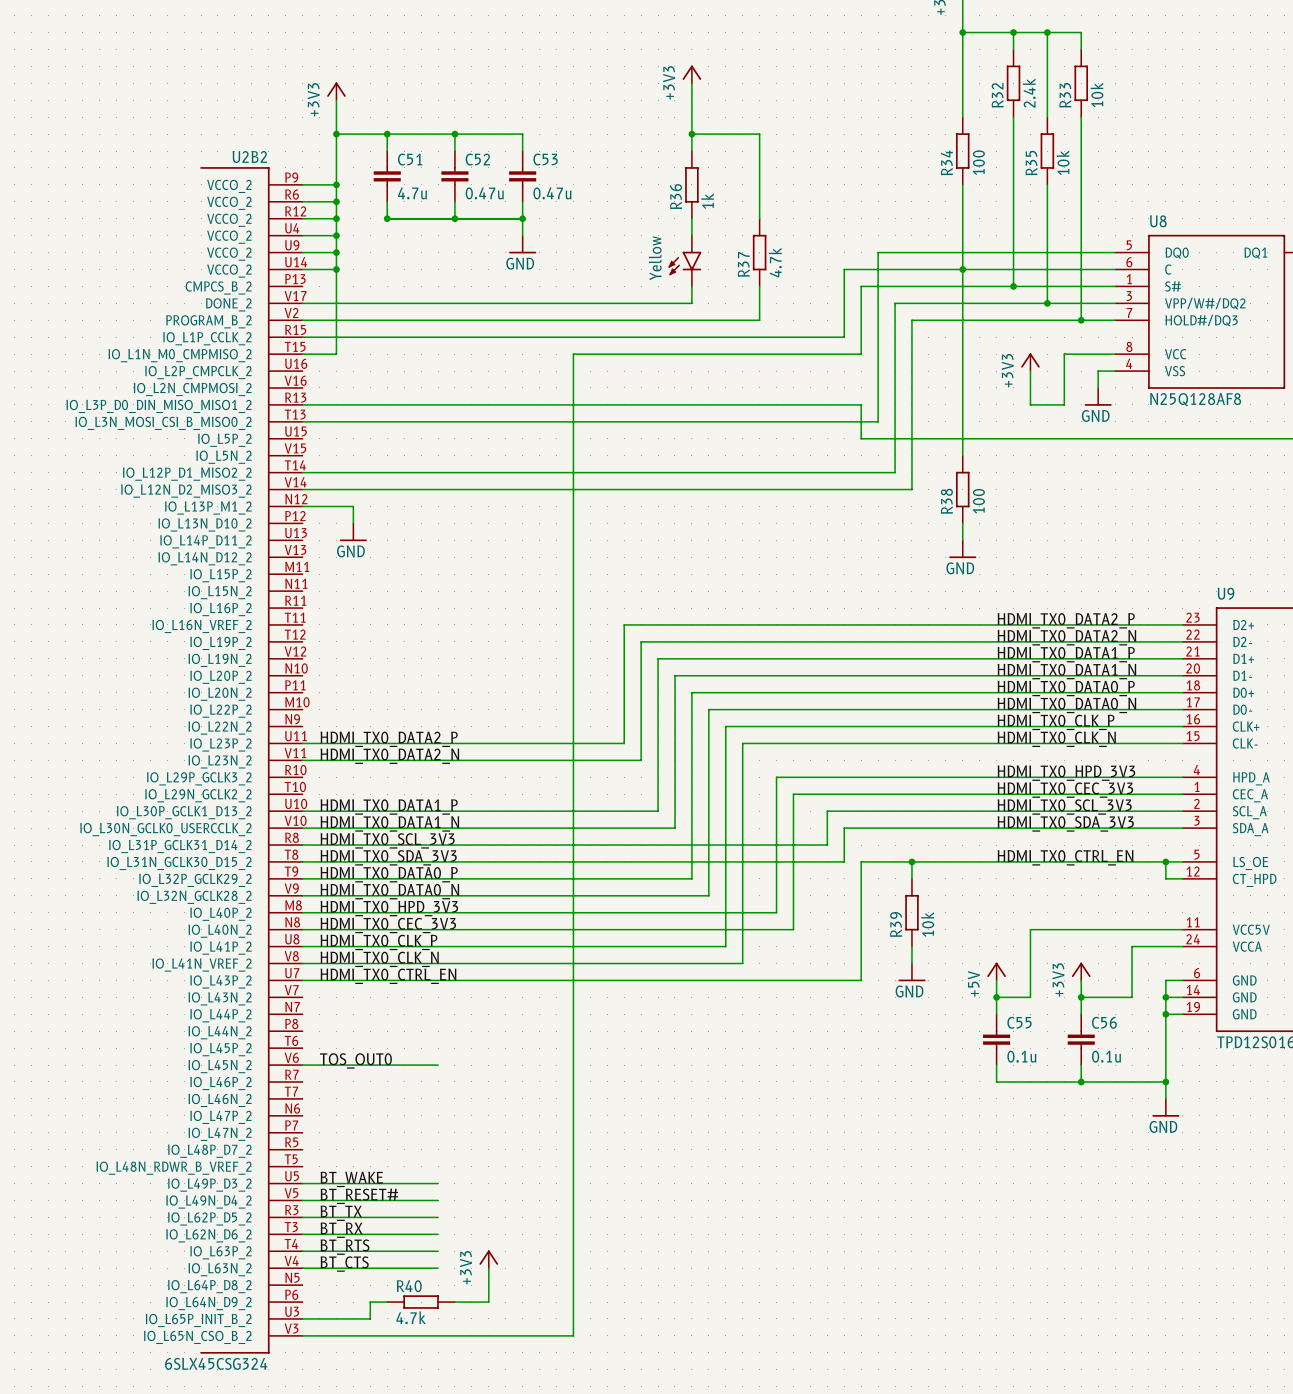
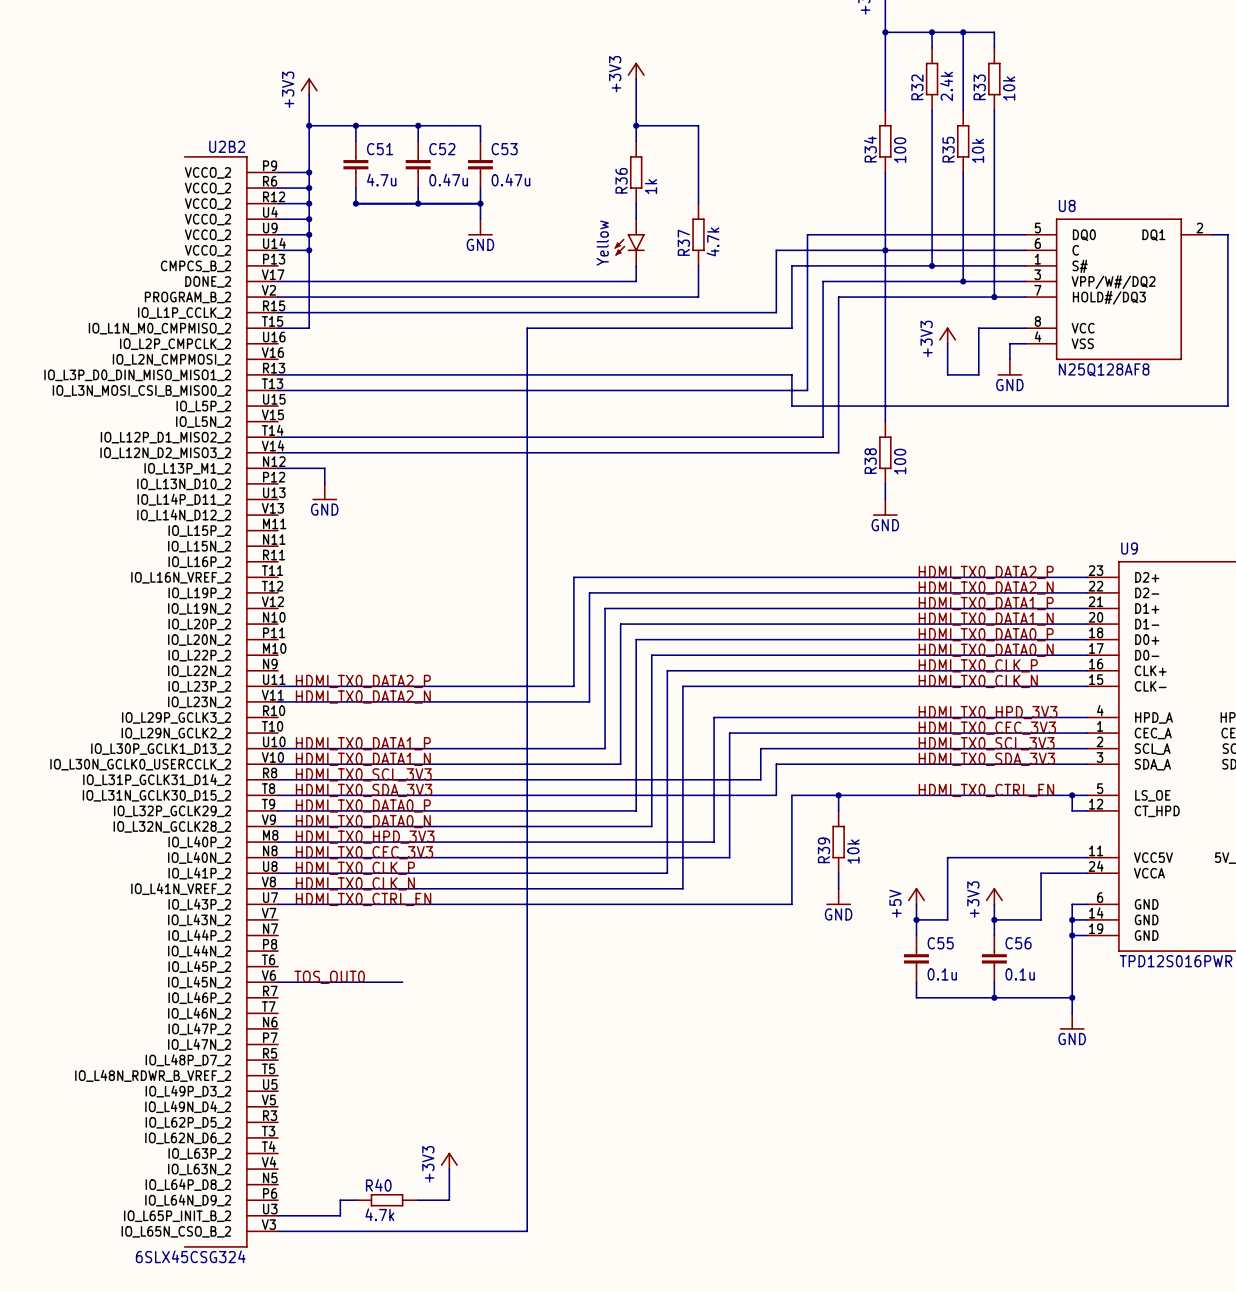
label: BT_WAKE (351, 1179) -> none
wire: (302, 1183) (438, 1183) -> none
label: BT_RESET# (359, 1196) -> none
wire: (302, 1200) (438, 1200) -> none
label: BT_TX (341, 1213) -> none
wire: (302, 1217) (438, 1217) -> none
label: BT_RX (341, 1230) -> none
wire: (302, 1234) (438, 1234) -> none
label: BT_RTS (345, 1247) -> none
wire: (302, 1251) (438, 1251) -> none
label: BT_CTS (344, 1264) -> none
wire: (302, 1268) (438, 1268) -> none

